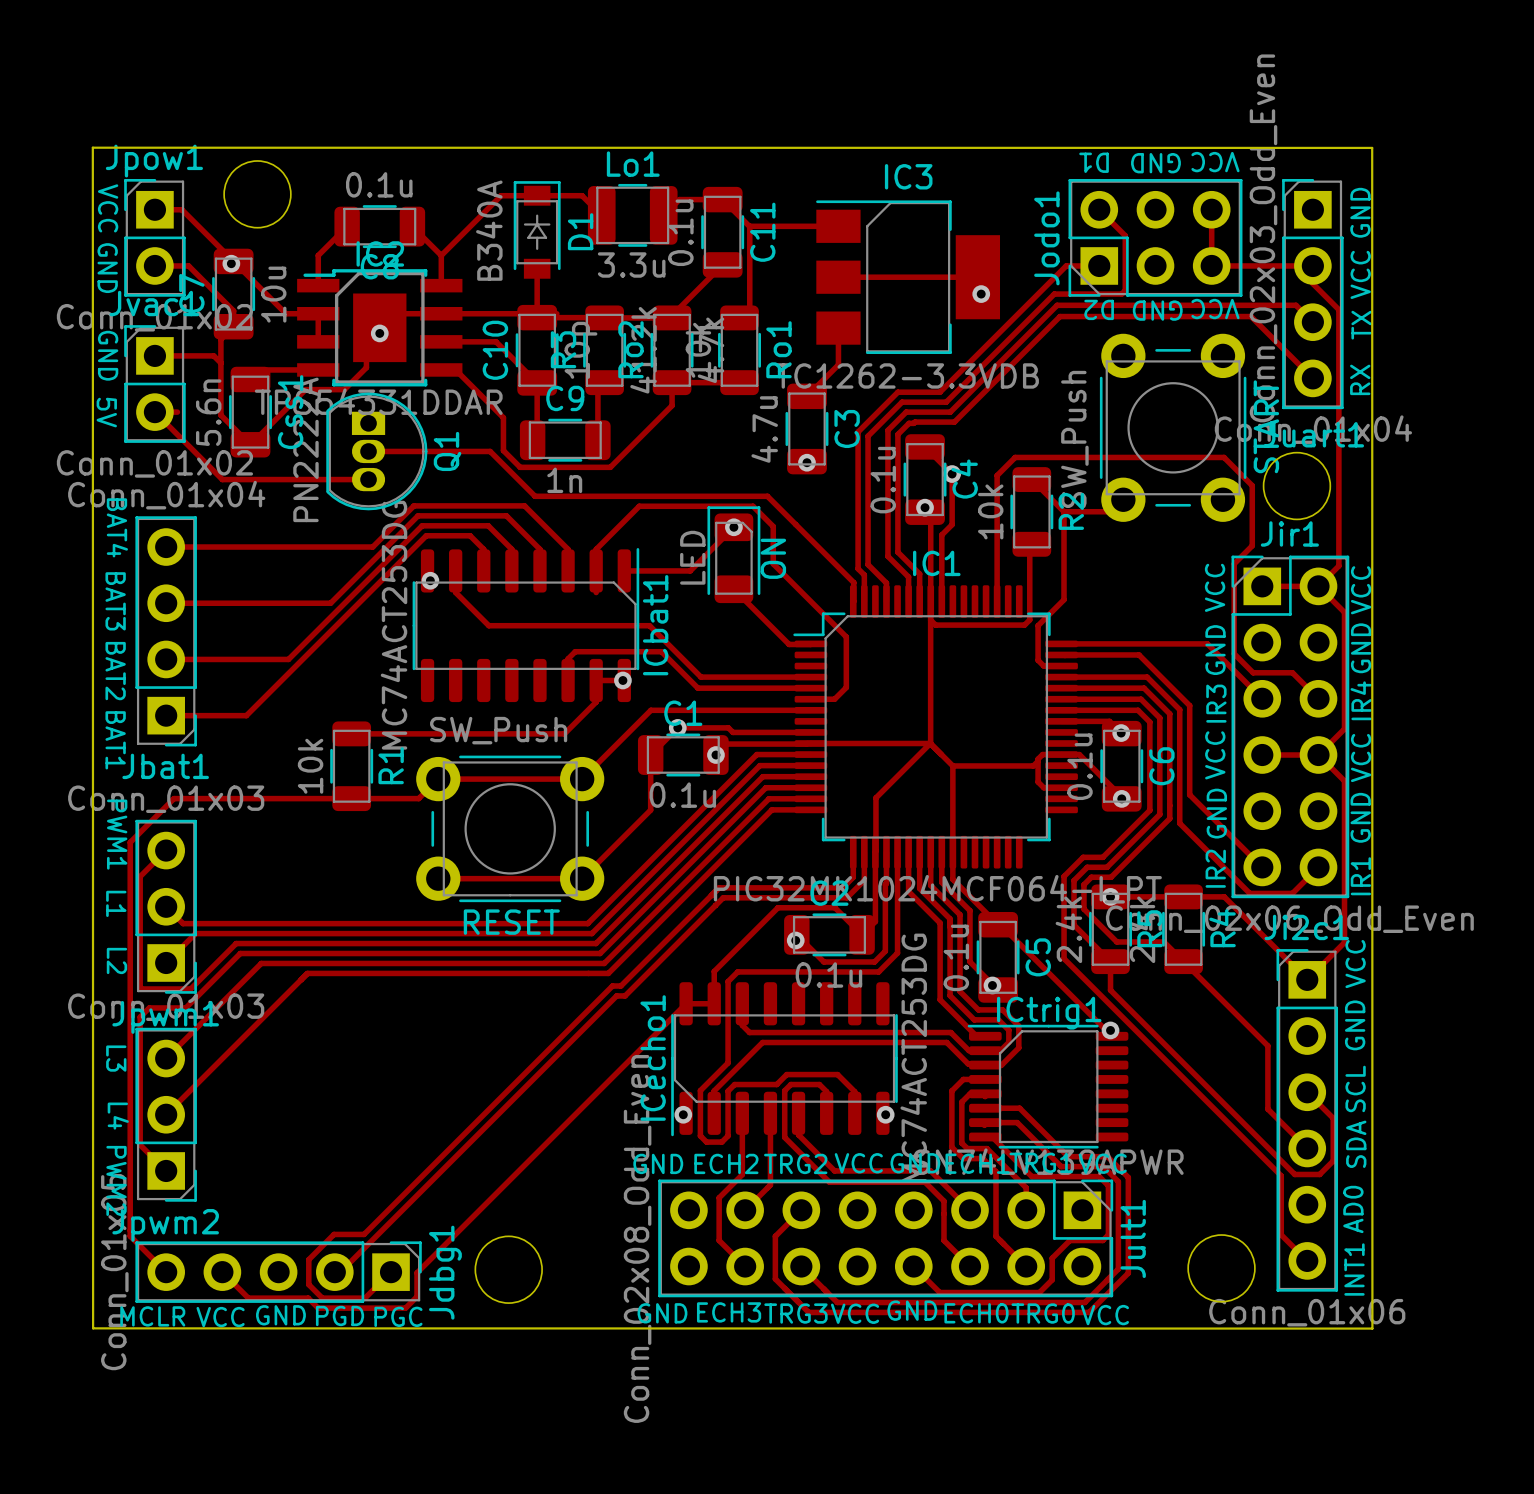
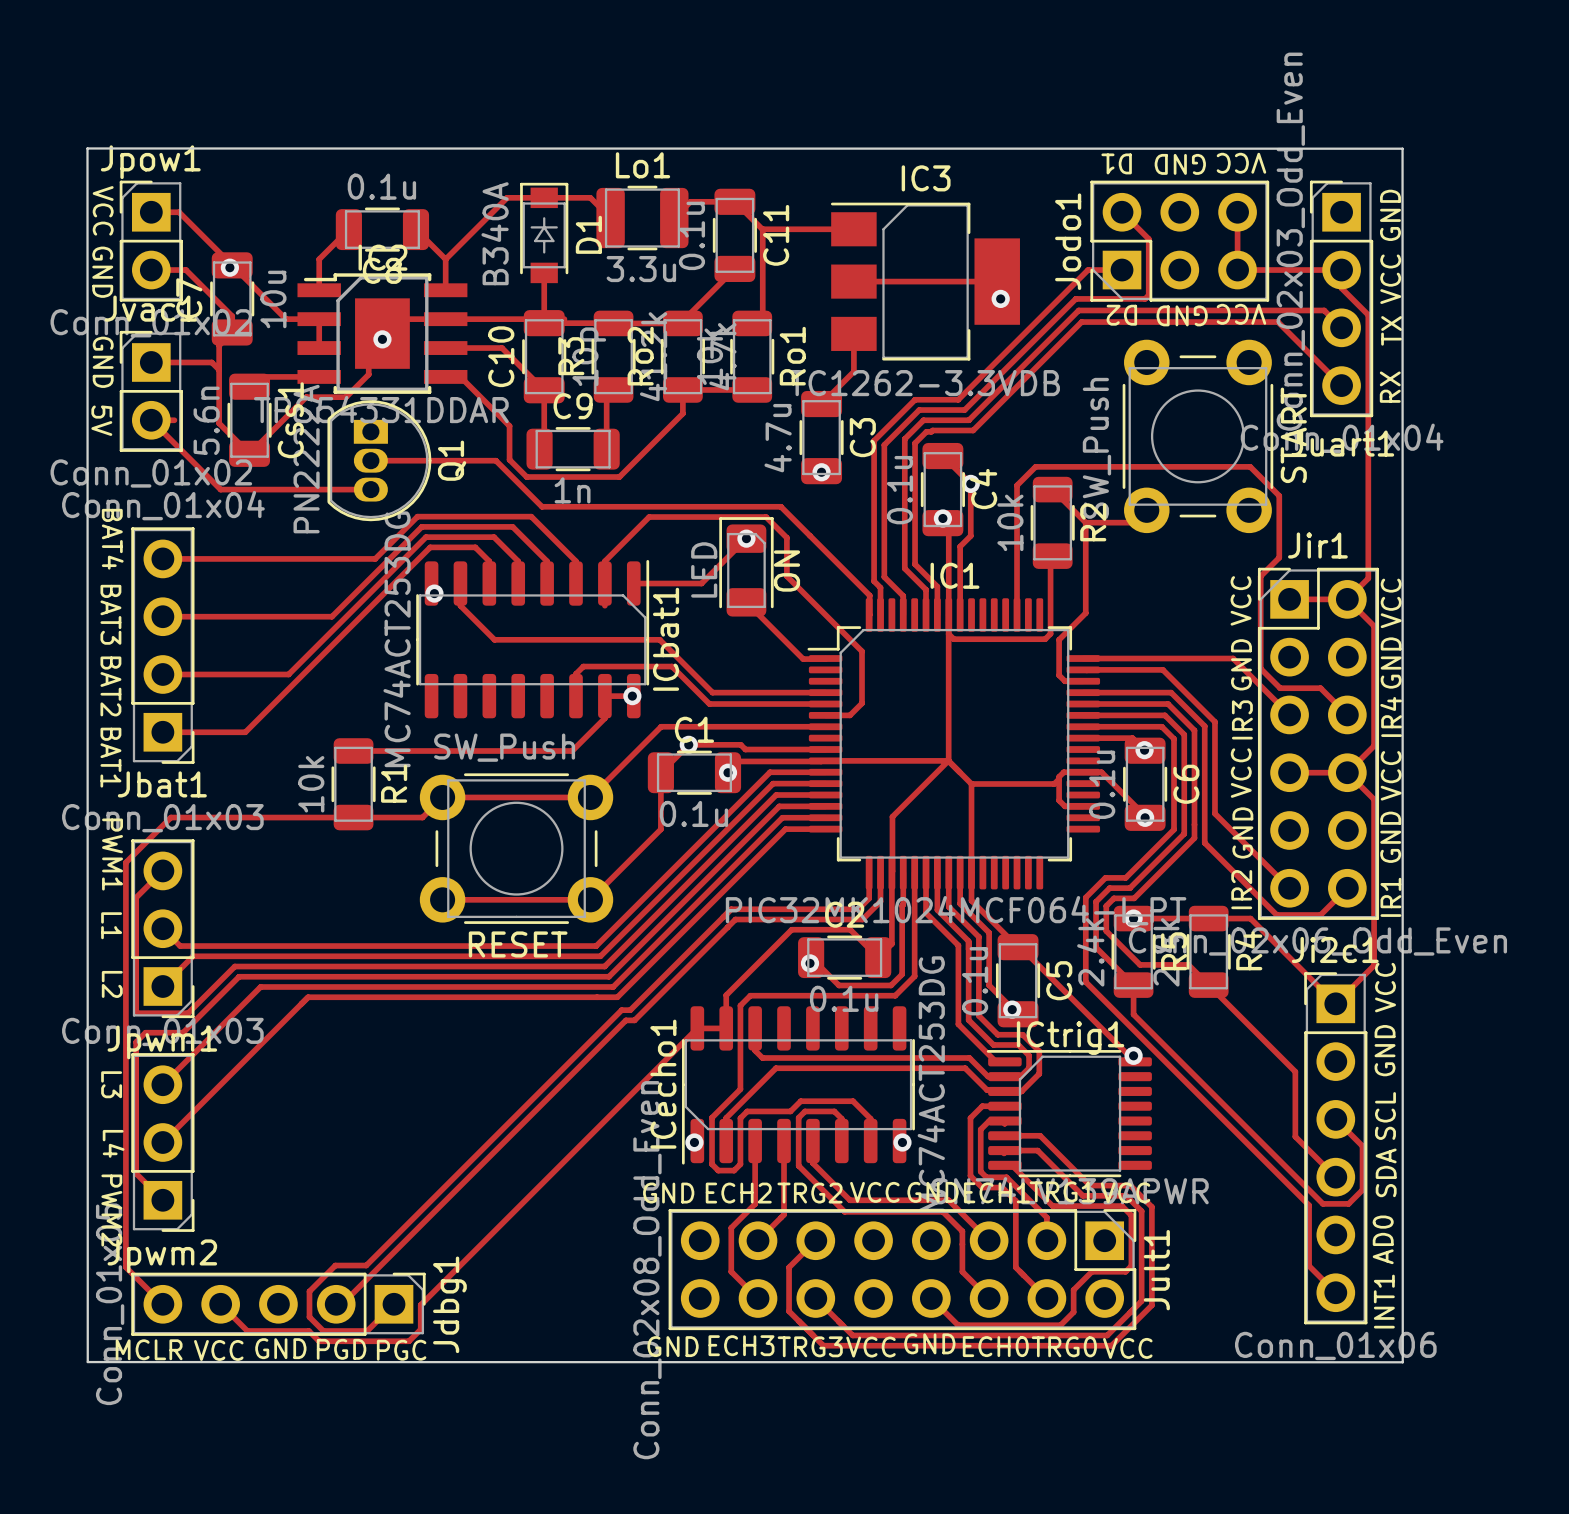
round board edge: [223, 160, 292, 229] -> none
round board edge: [1263, 452, 1331, 520] -> none
round board edge: [1187, 1234, 1256, 1303] -> none
round board edge: [474, 1235, 543, 1304] -> none

